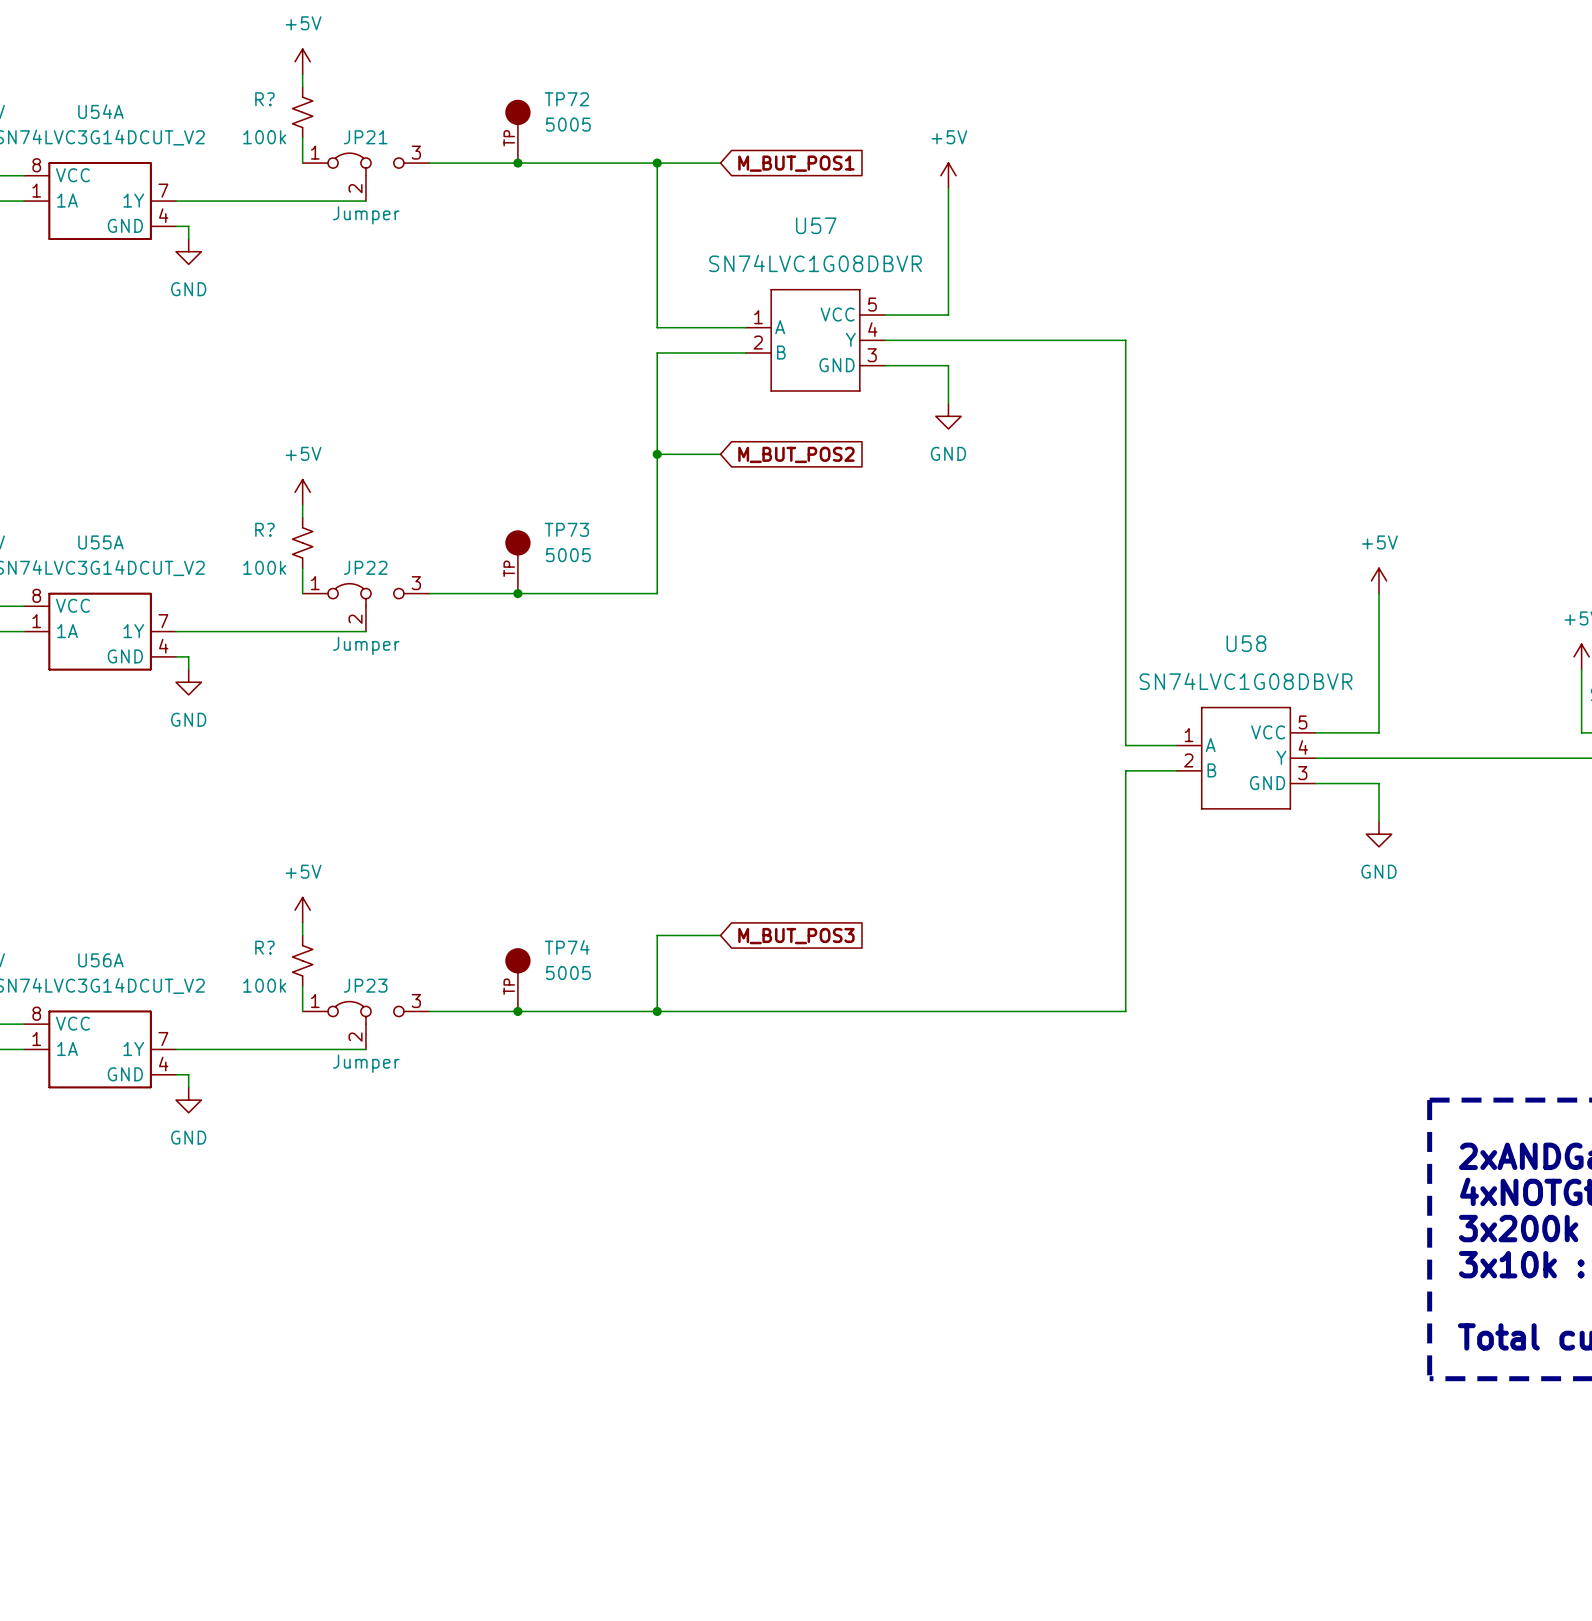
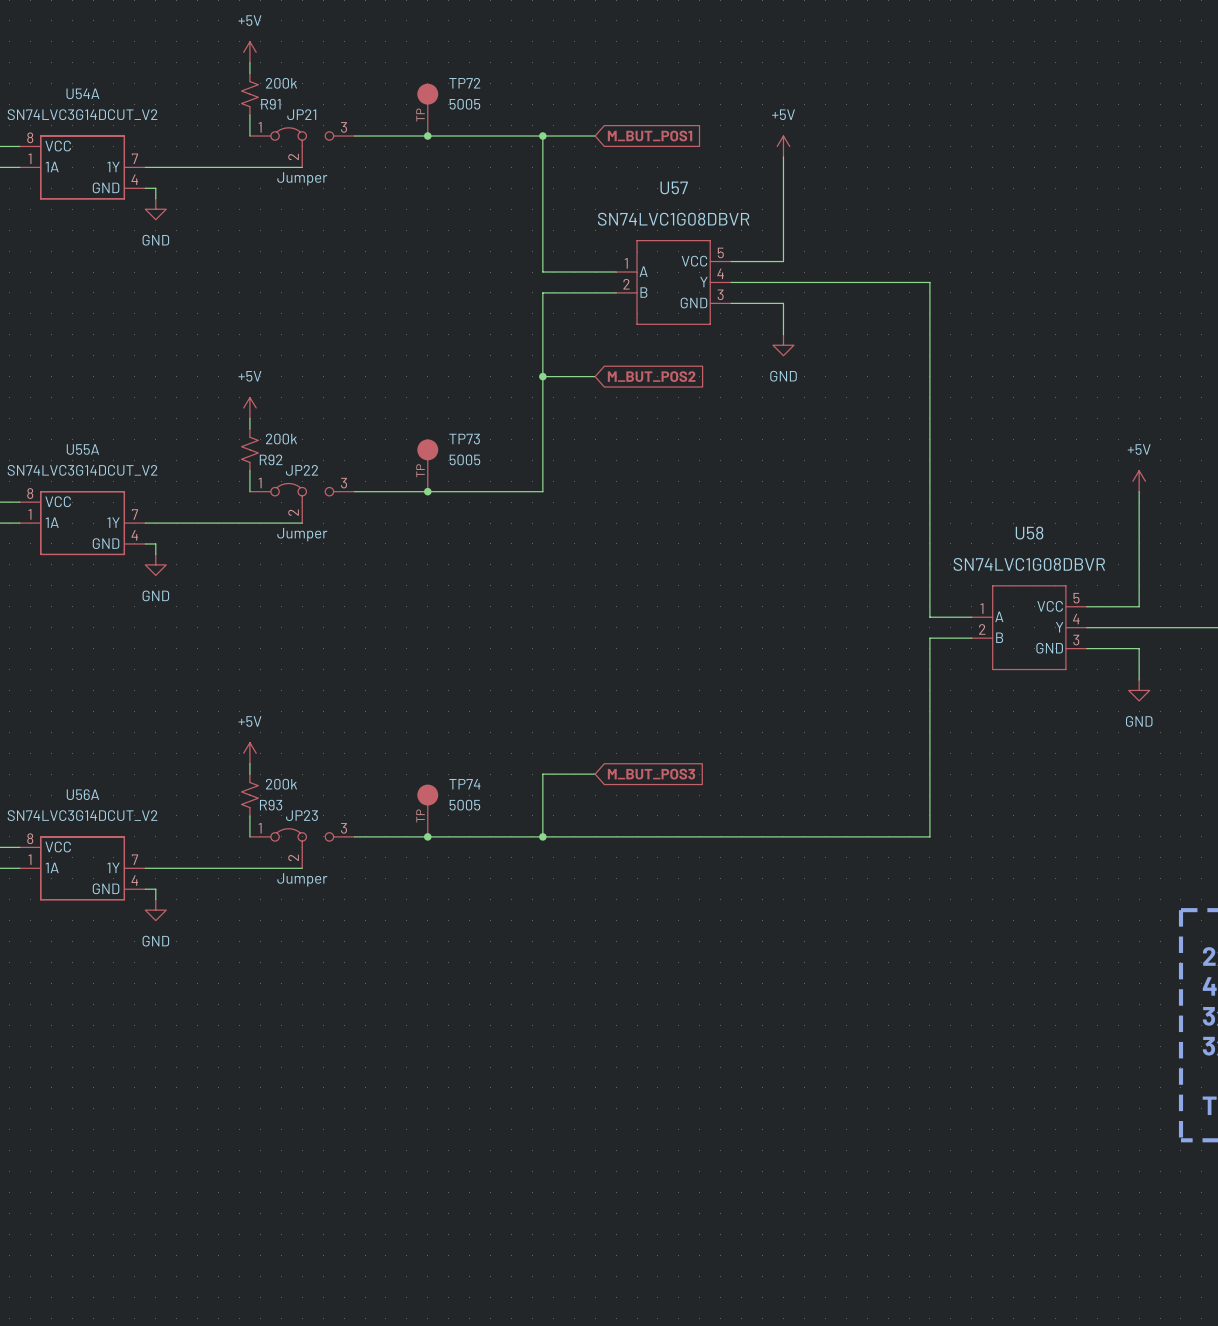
R? name: R? (264, 99) -> R91 (270, 104)
R? value: 100k (264, 137) -> 200k (281, 83)
R? name: R? (264, 529) -> R92 (271, 459)
R? value: 100k (264, 567) -> 200k (281, 439)
R? name: R? (264, 947) -> R93 (271, 805)
R? value: 100k (264, 985) -> 200k (281, 784)

